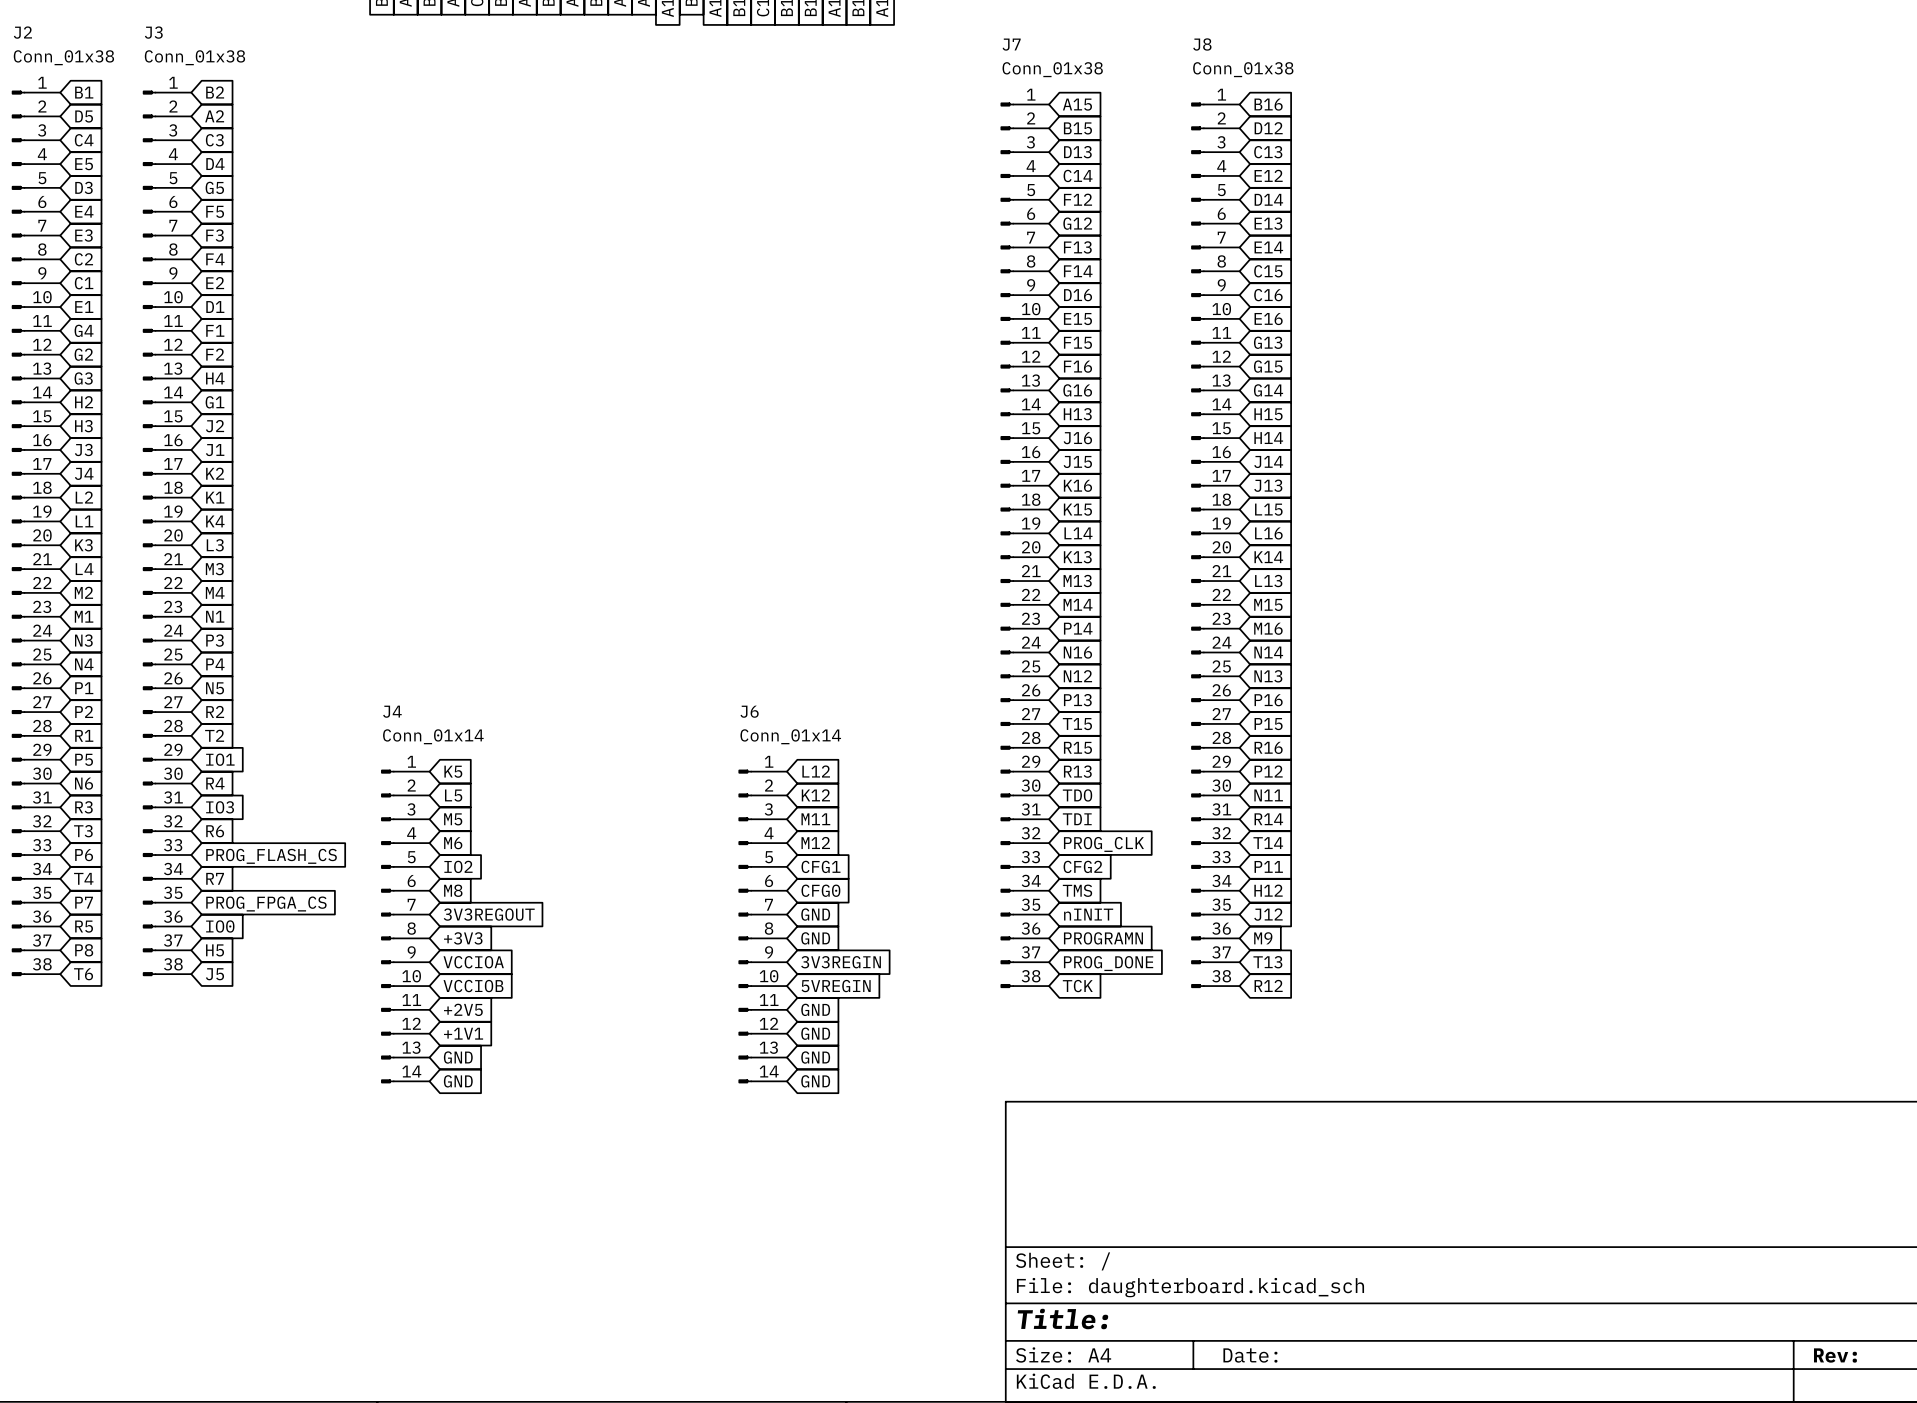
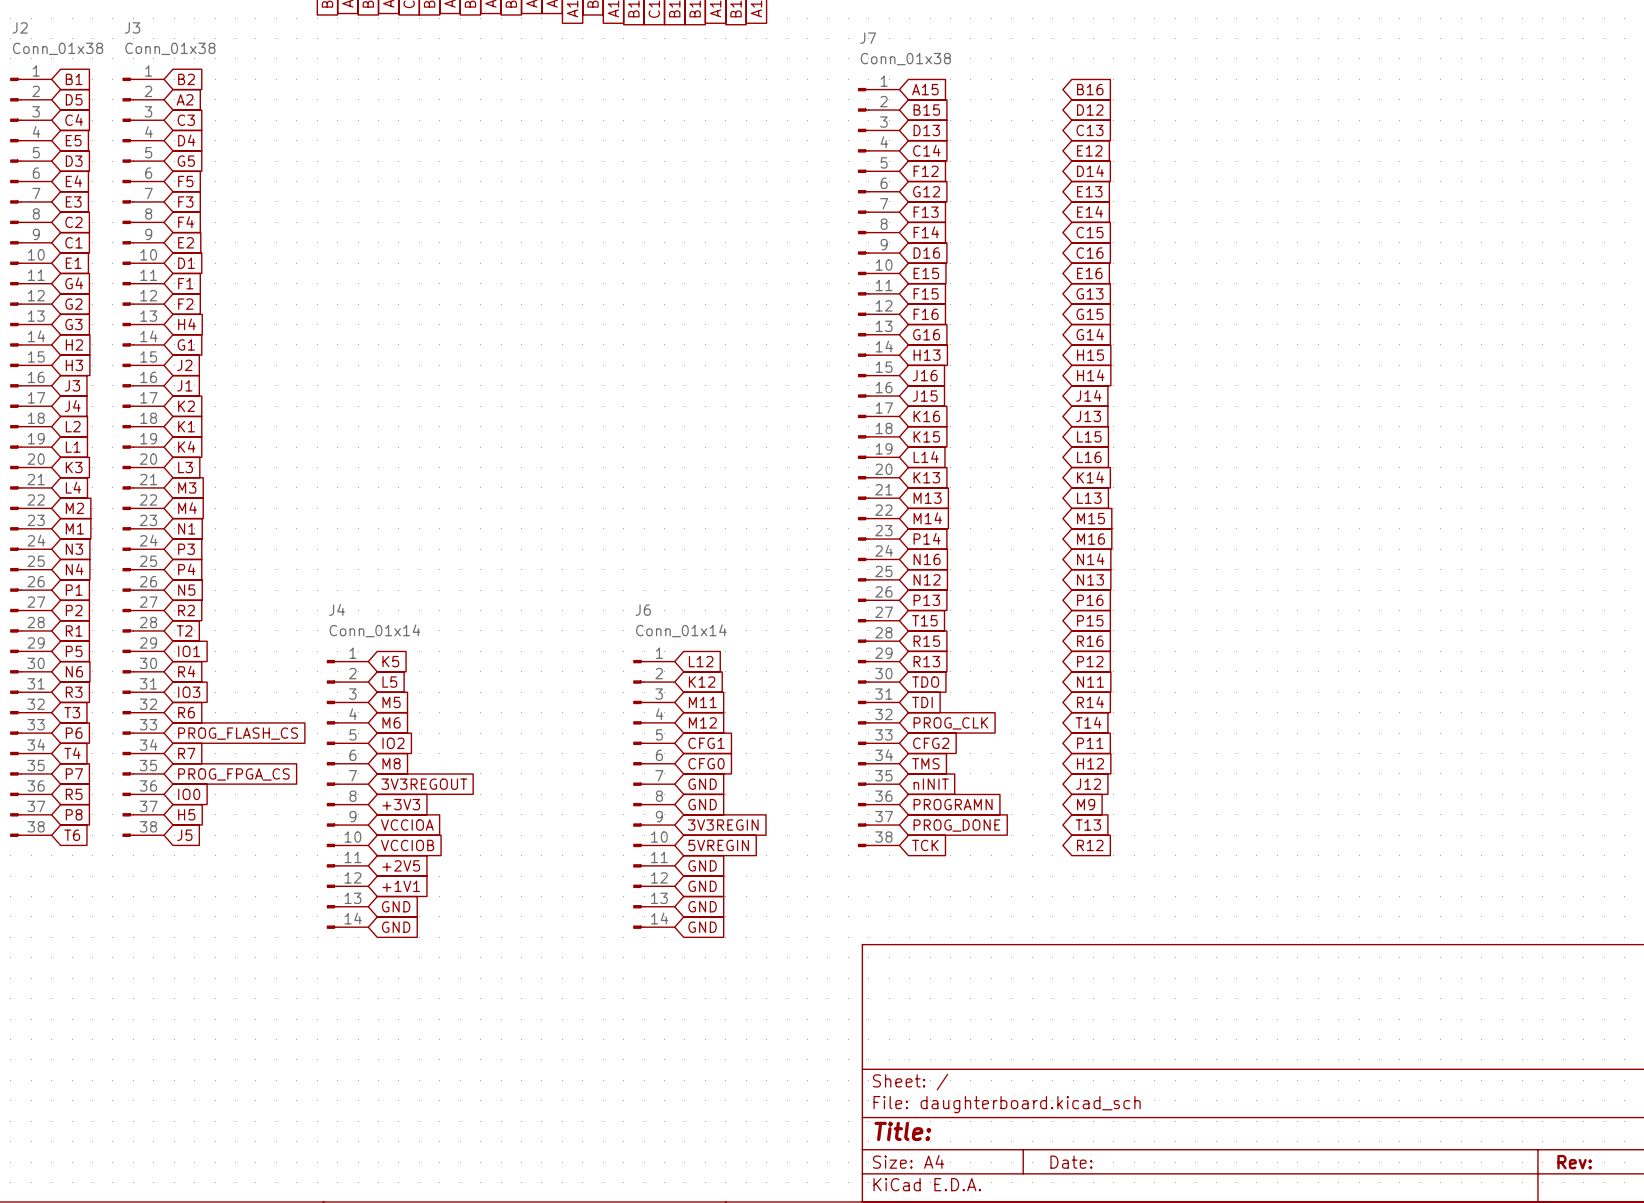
J8: Conn_01x38 (1215, 545) -> none

